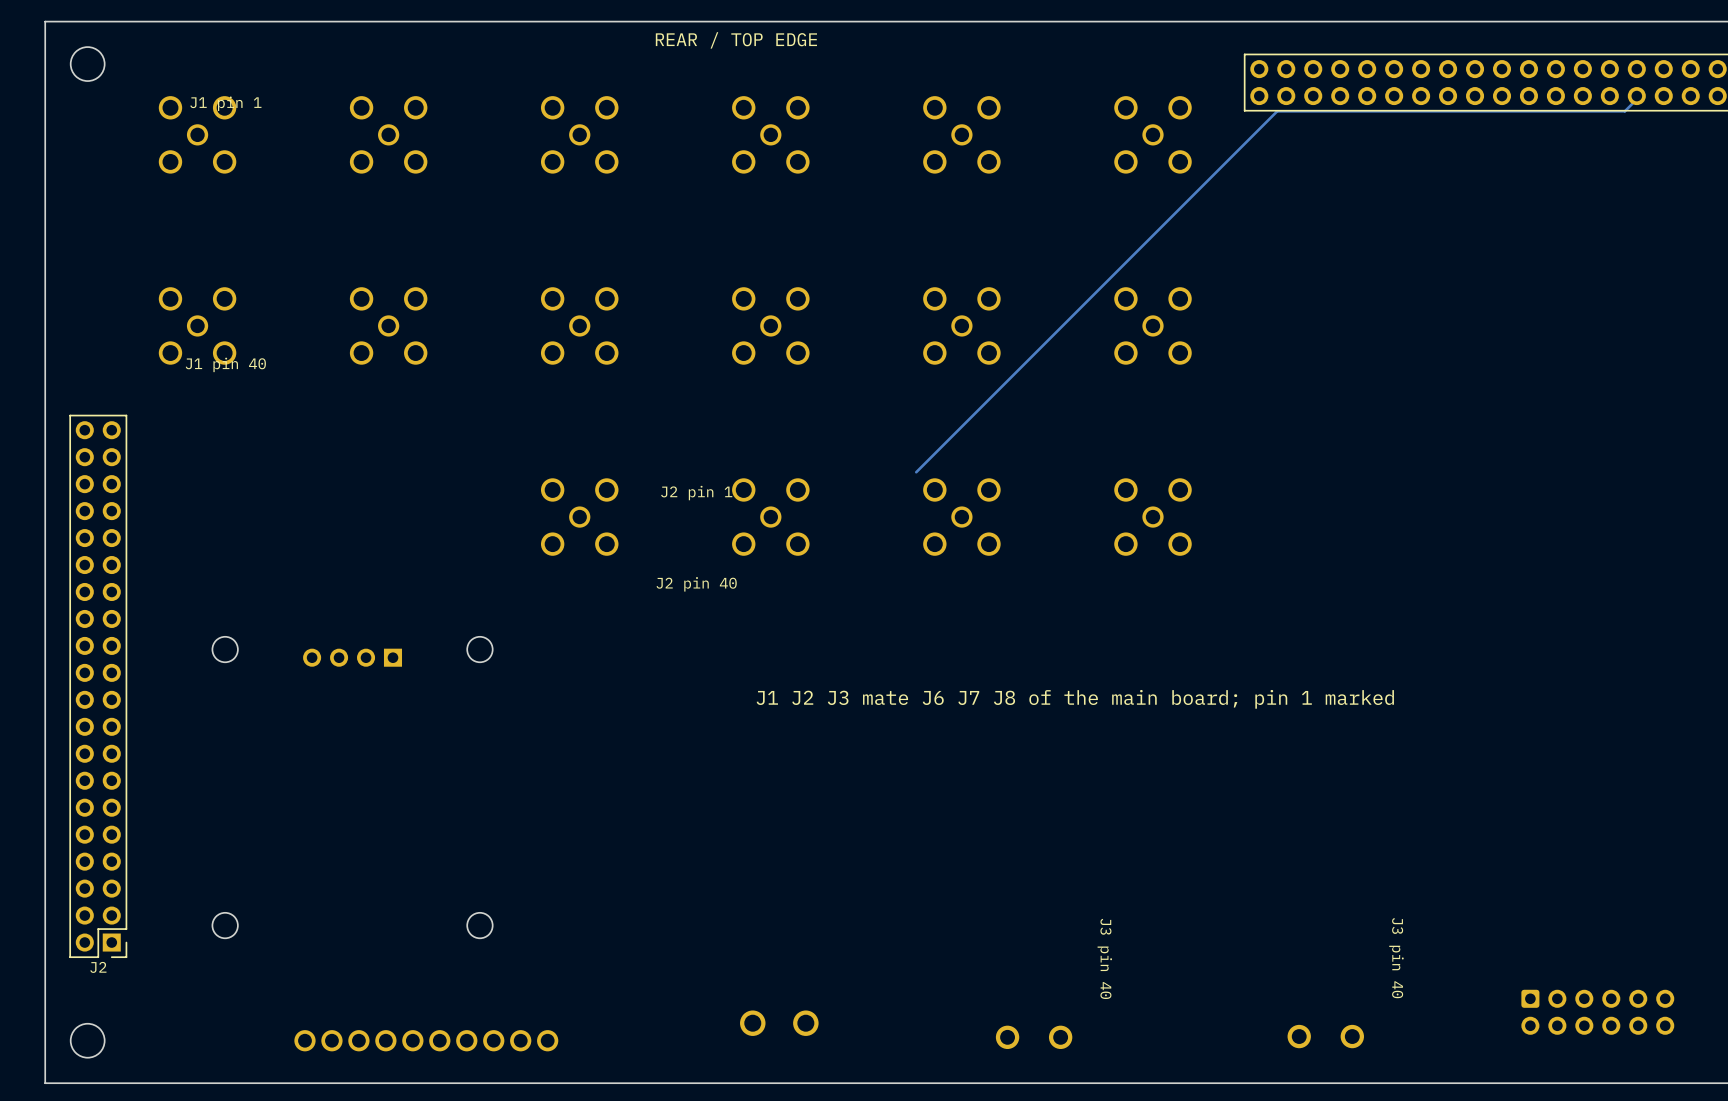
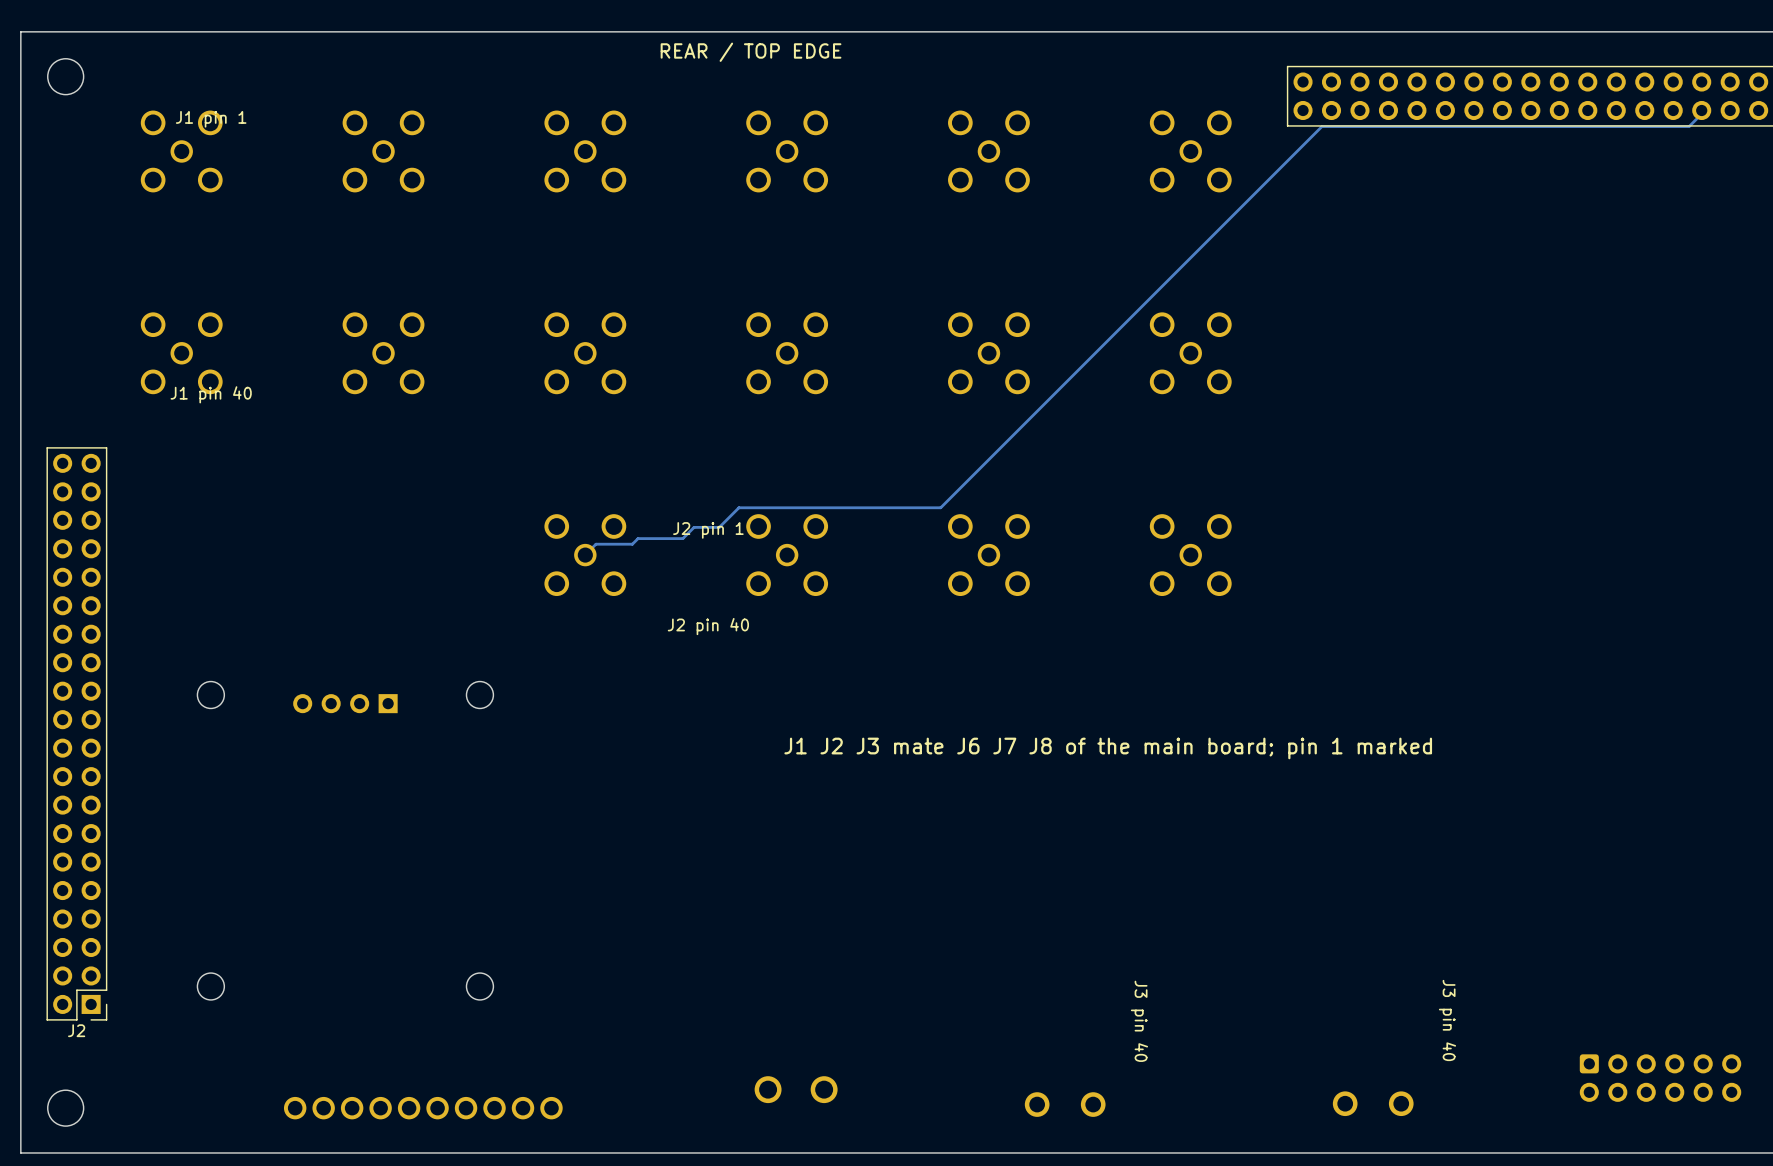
track: none -> (940, 507) (738, 507) (719, 527) (694, 527) (682, 538) (638, 538) (632, 544) (595, 544) (585, 554)

